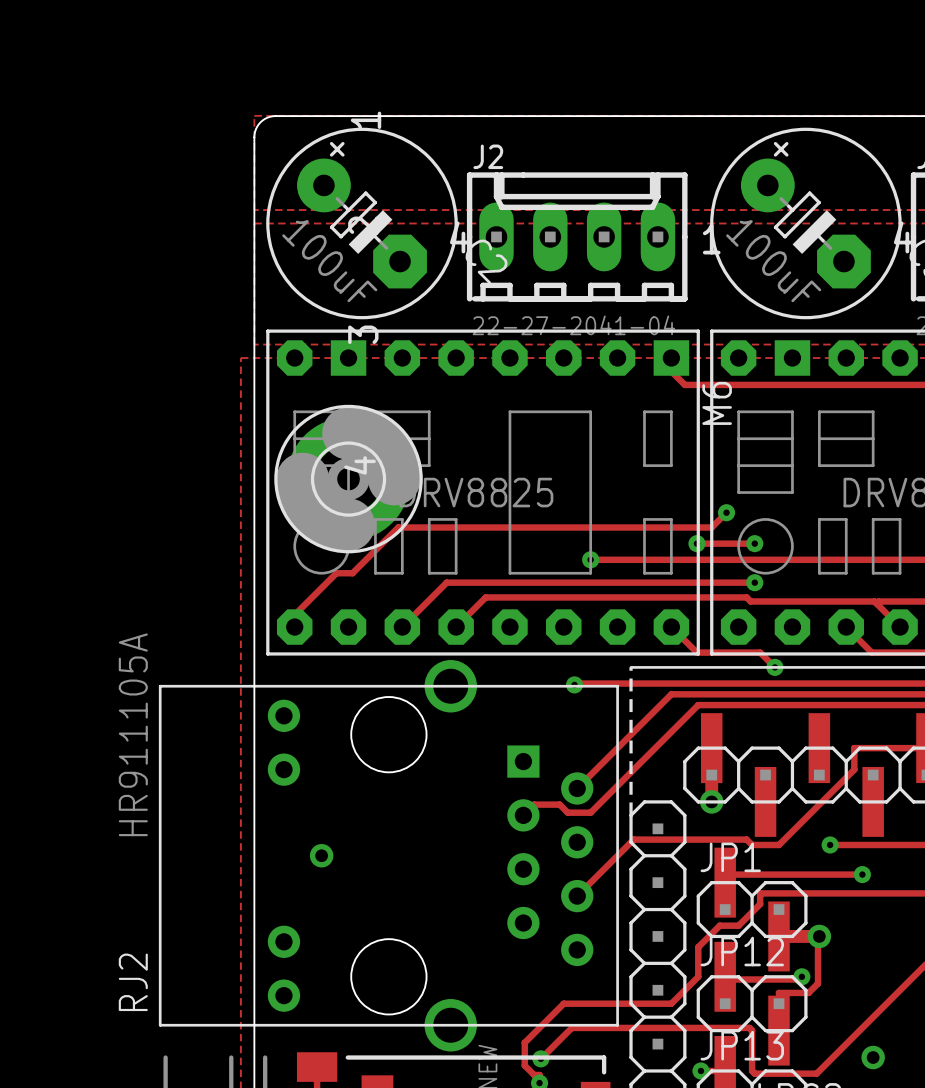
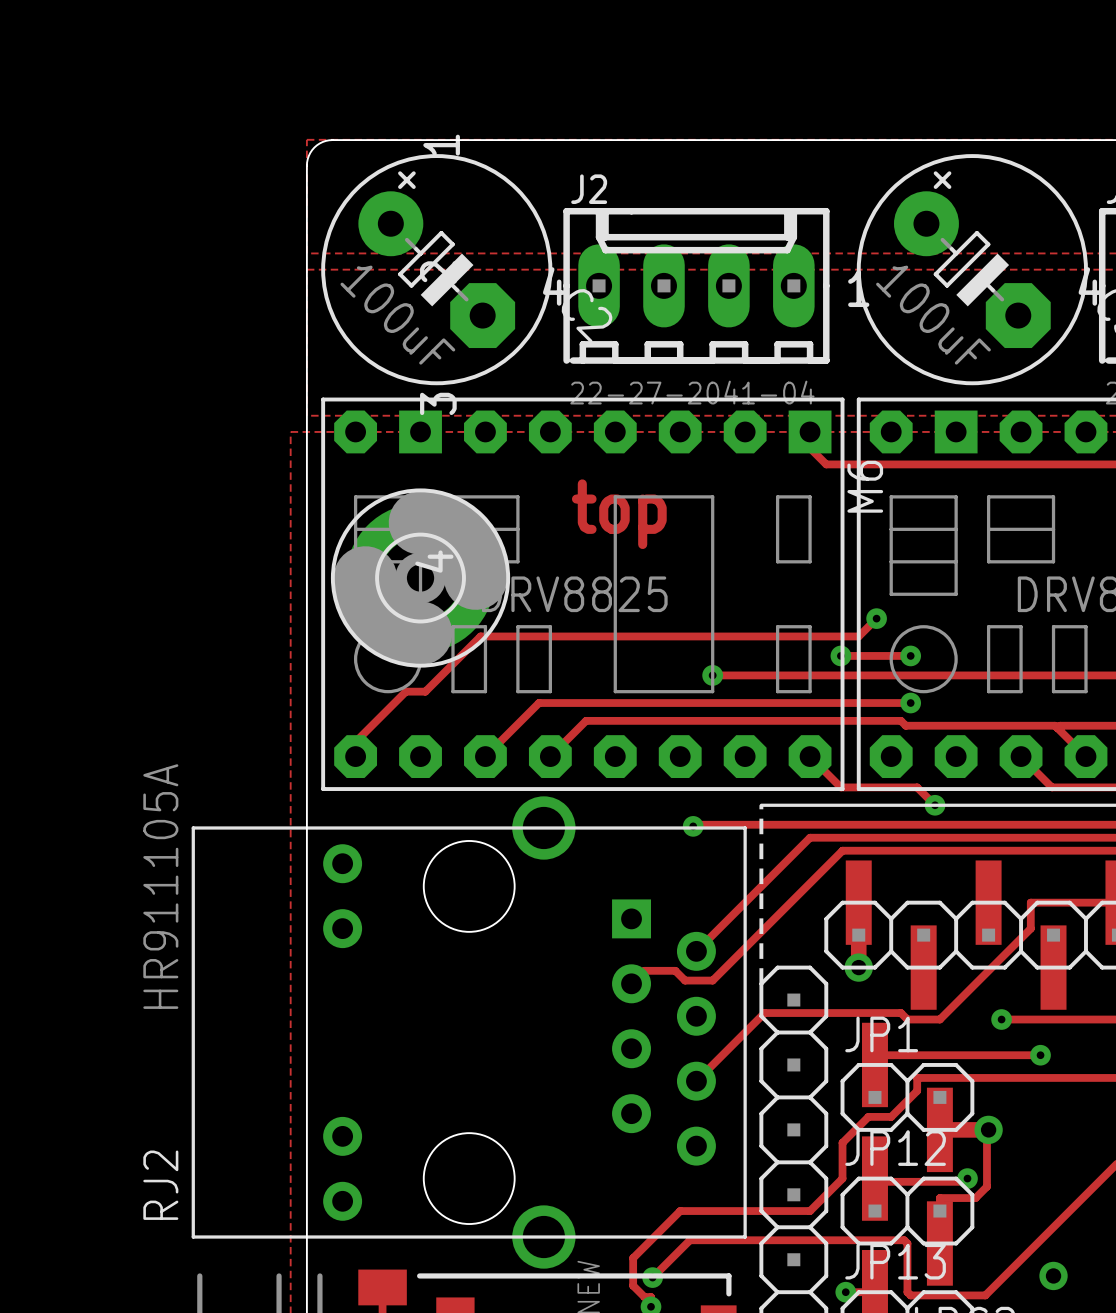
text: none -> top (619, 514)
via: (321, 855) -> none

